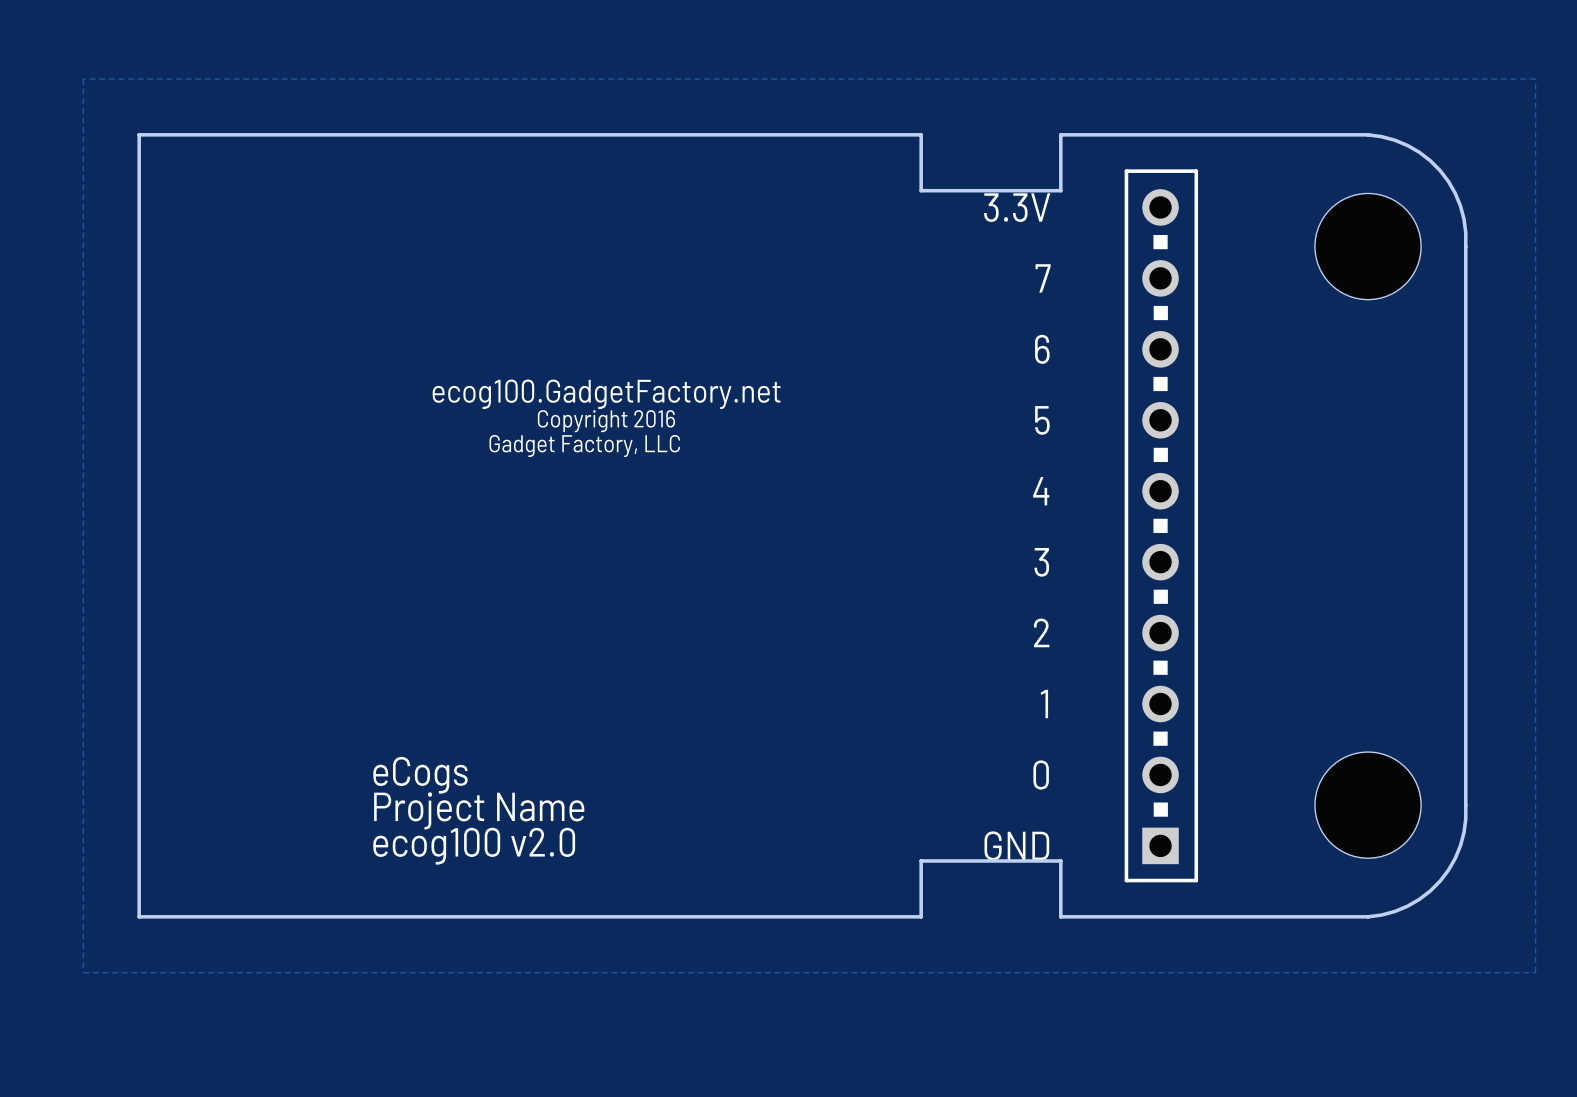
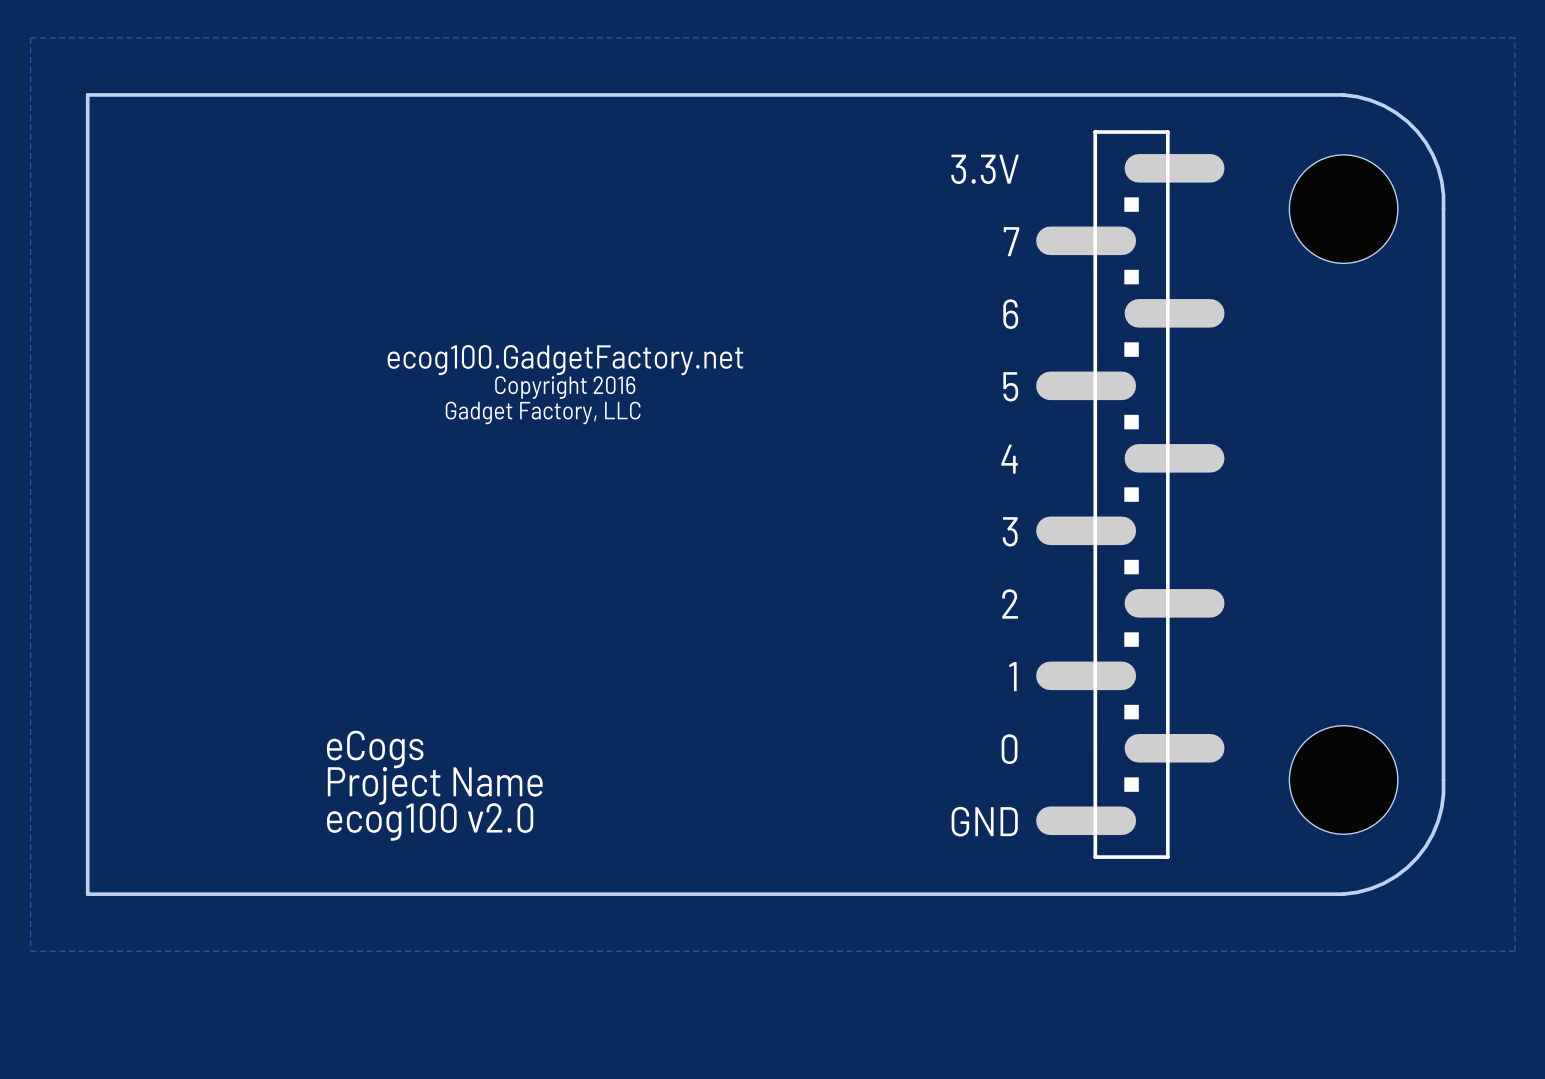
part footprint: [137, 133, 1468, 919] -> [85, 93, 1446, 896]

